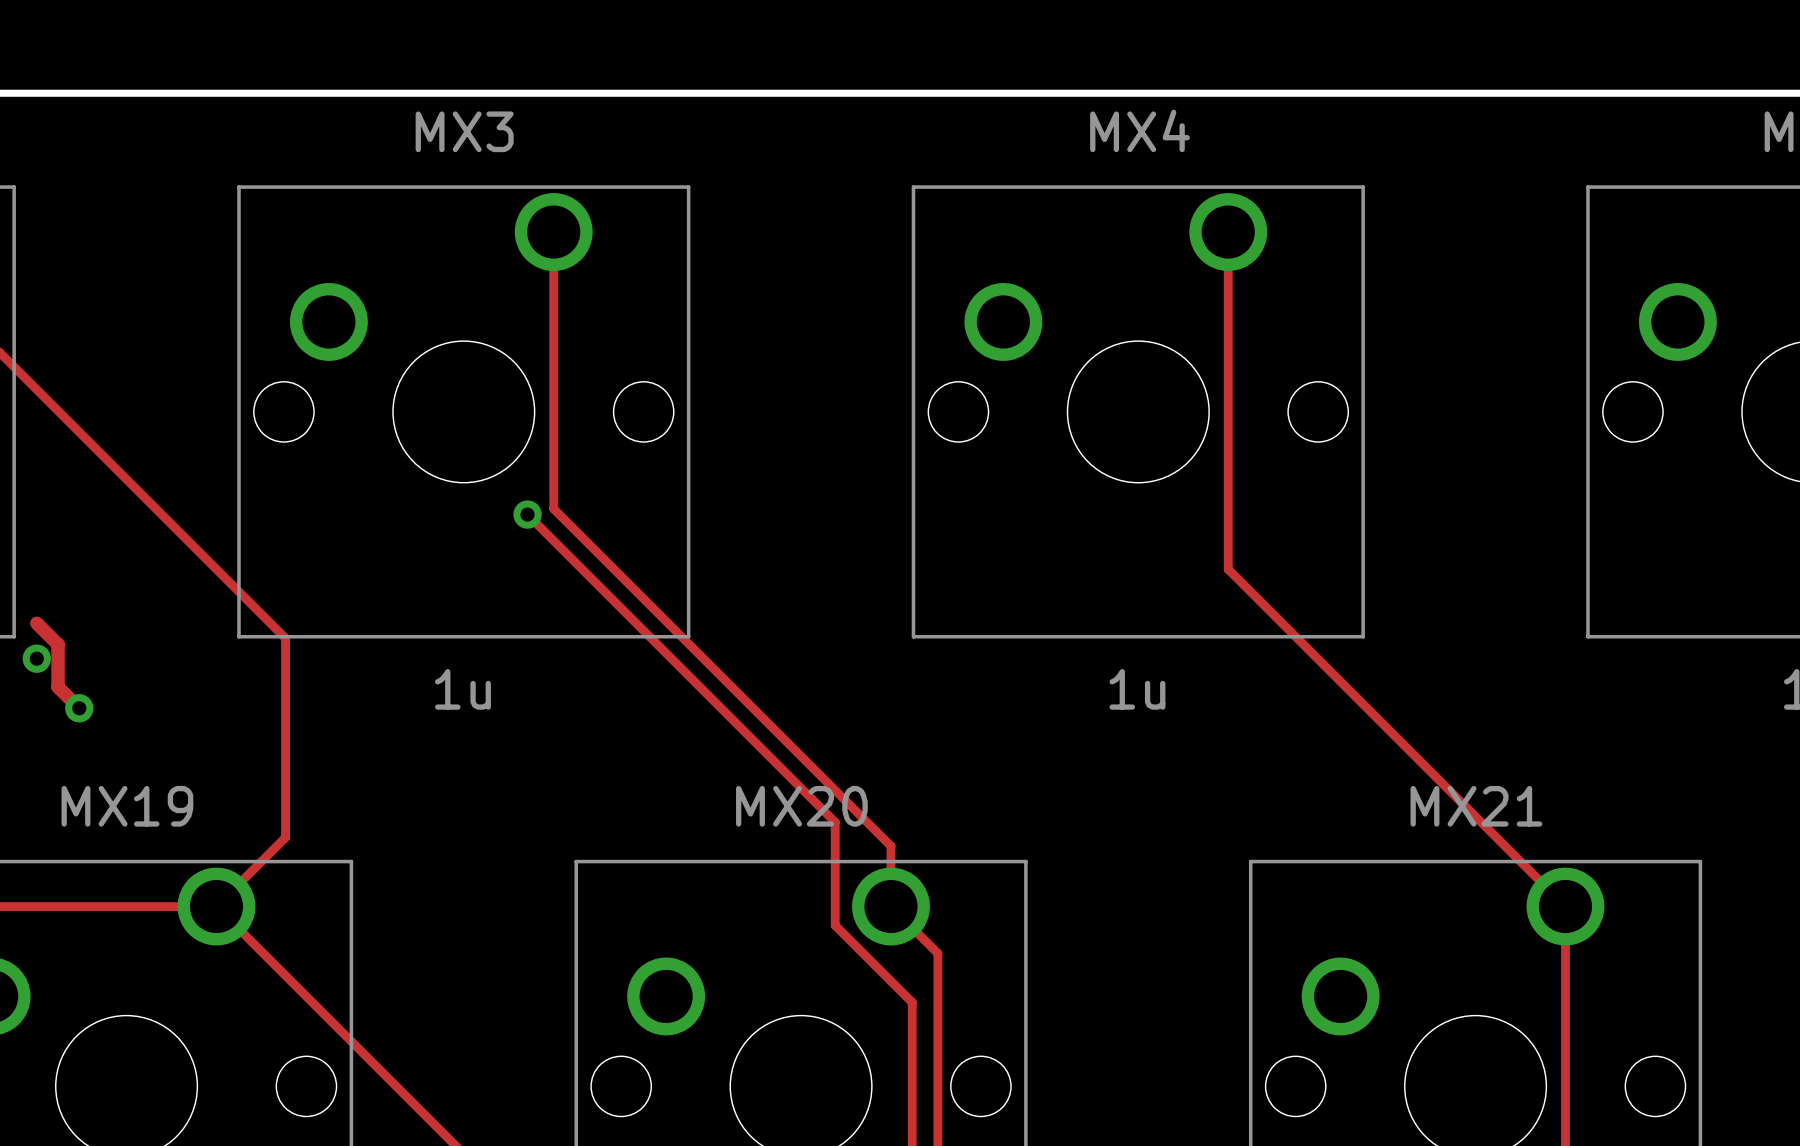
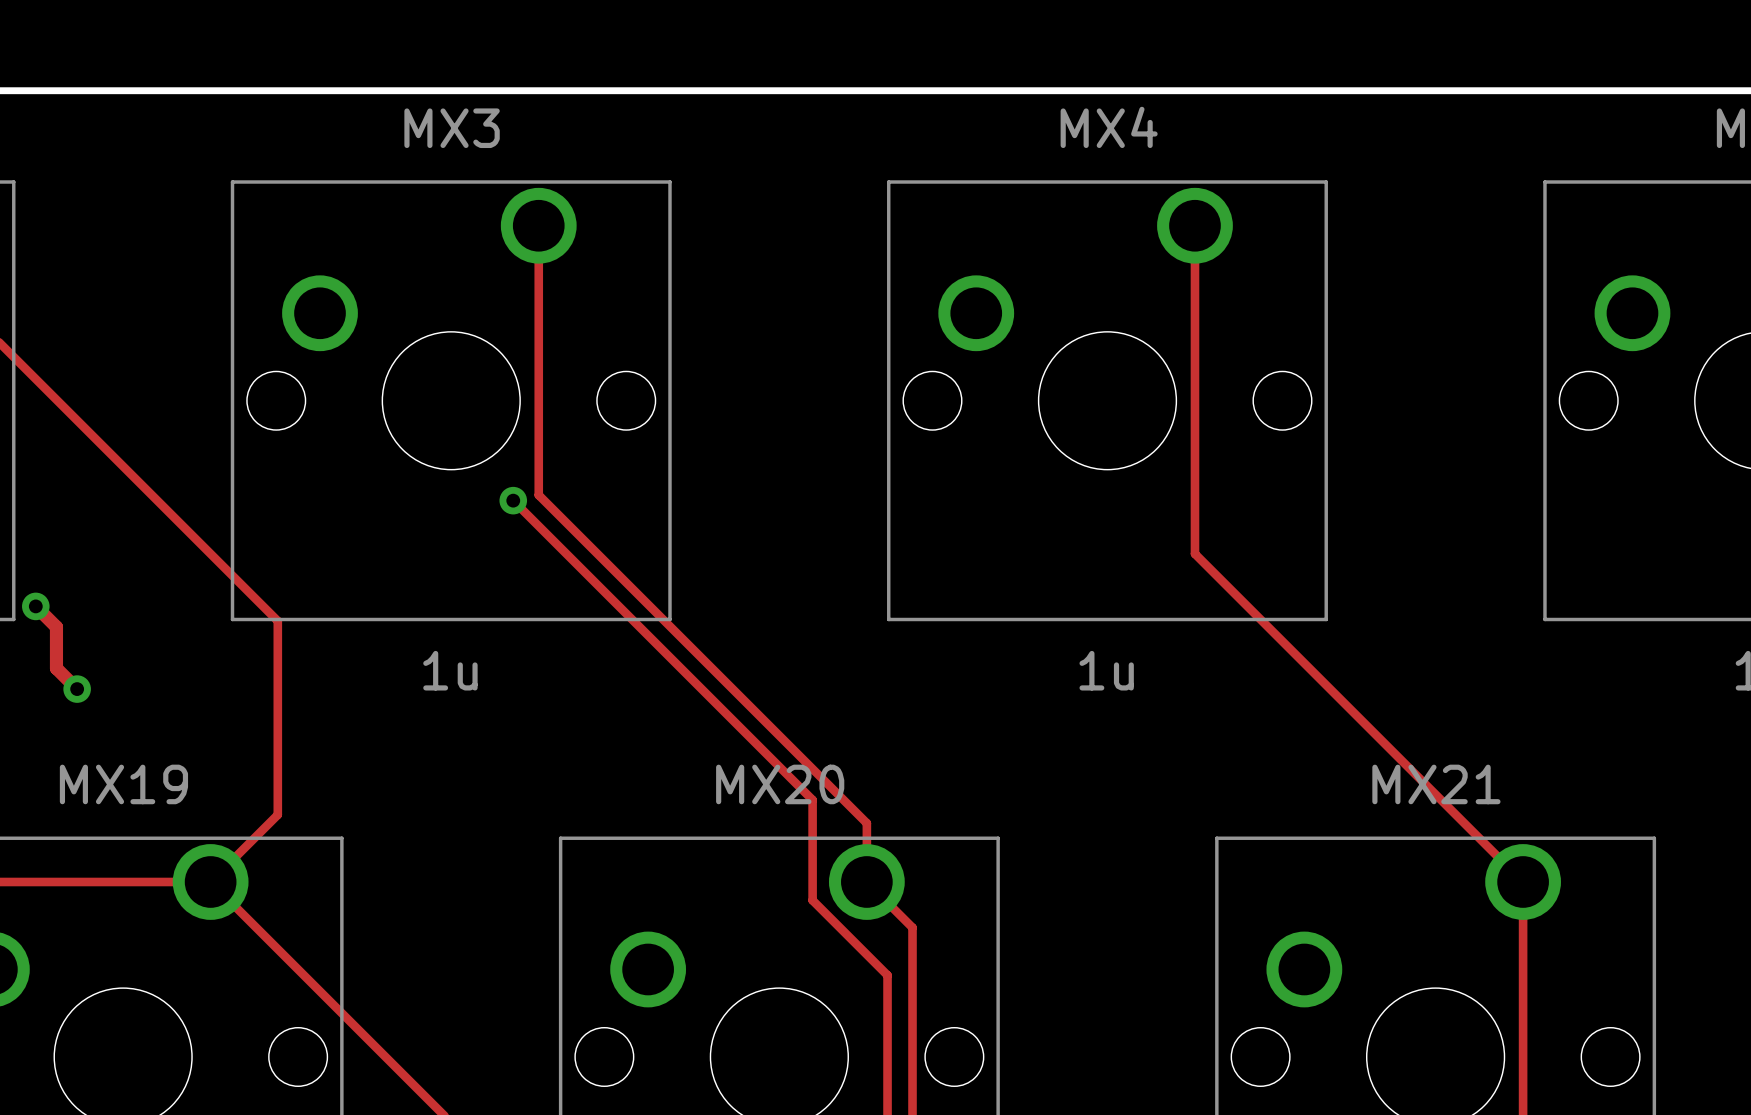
via position: (36, 658) -> (35, 606)

